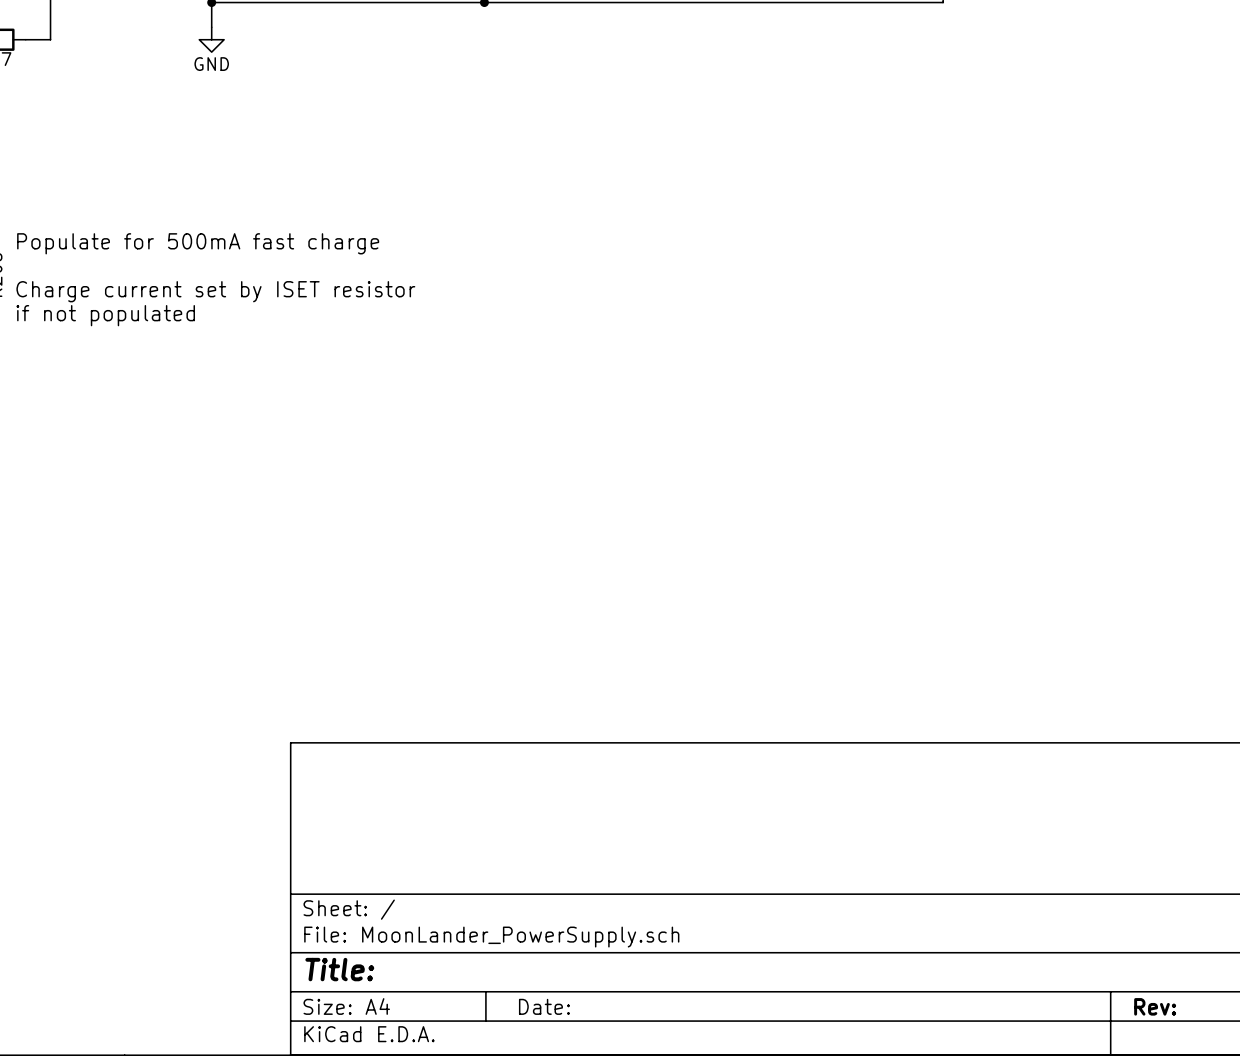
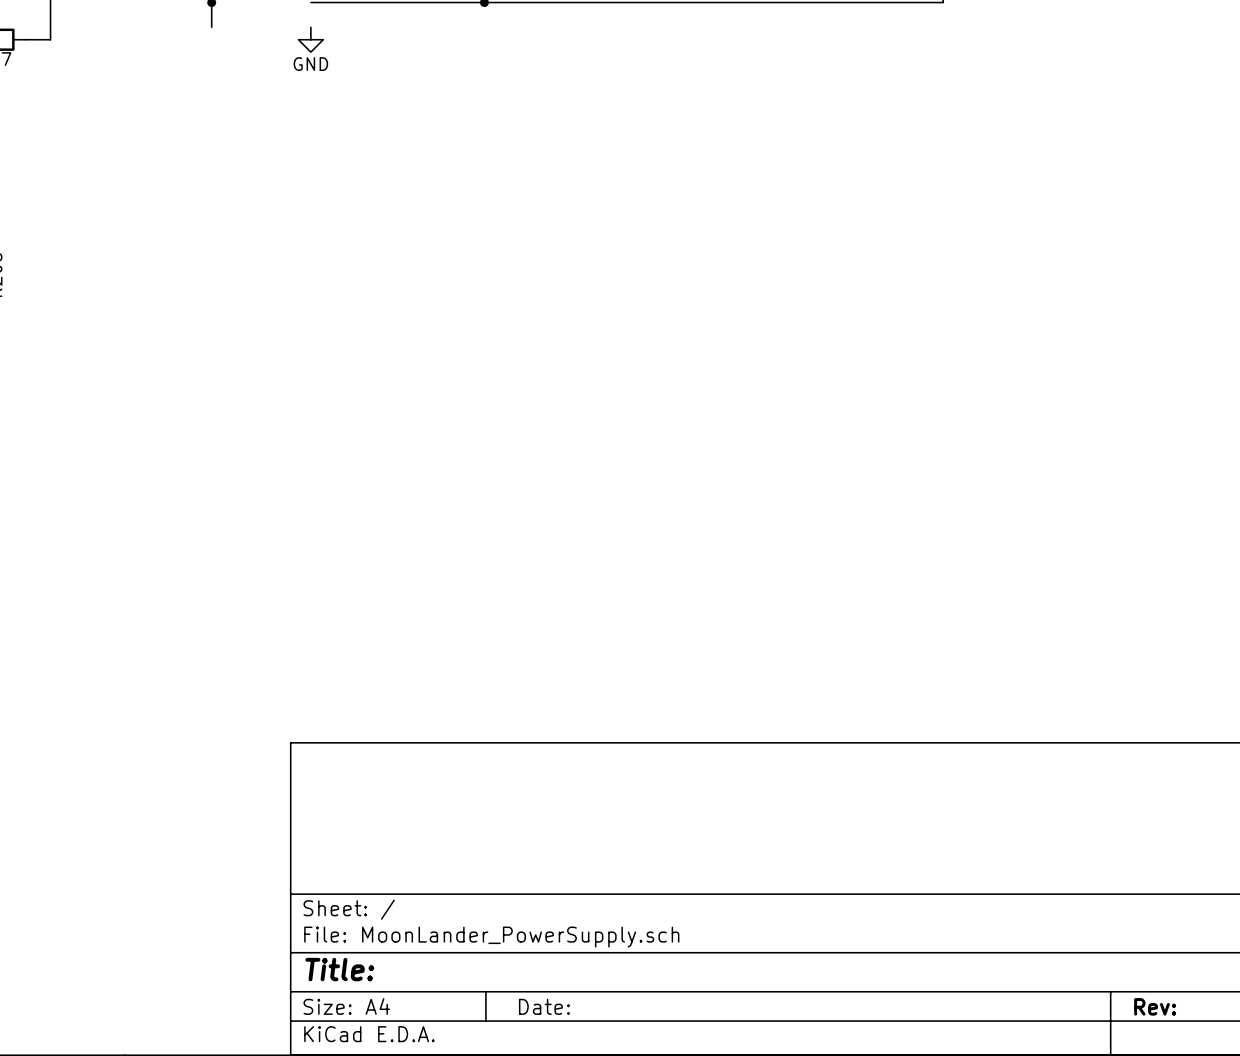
wire: (211, 2) (310, 2) -> none
power symbol position: GND (211, 39) -> GND (310, 39)
text: Populate for 500mA fast charge (198, 243) -> none
text: Charge current set by ISET resistor (215, 291) -> none
text: if not populated (105, 315) -> none

